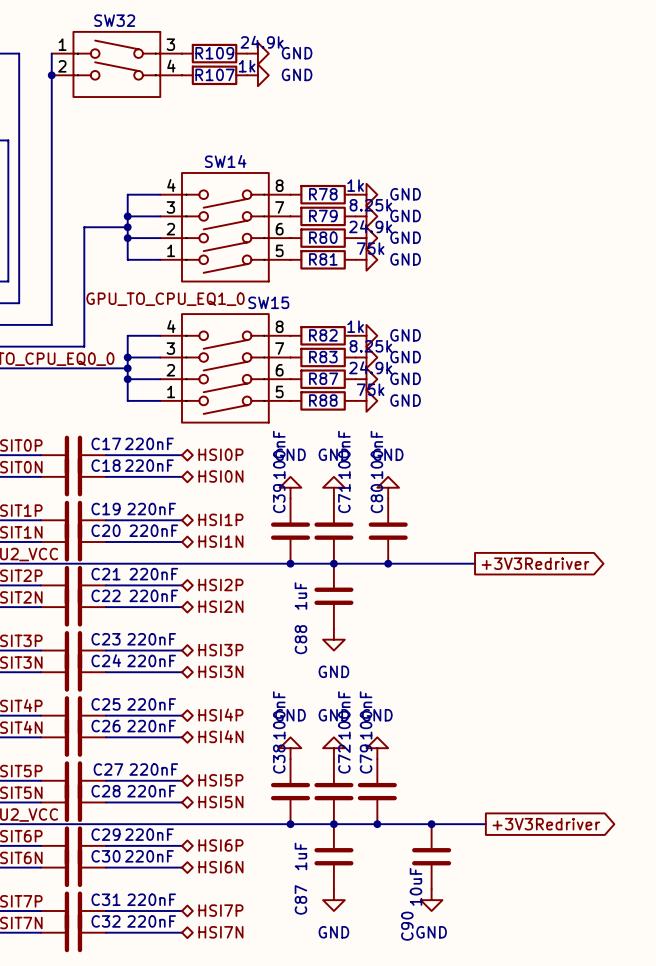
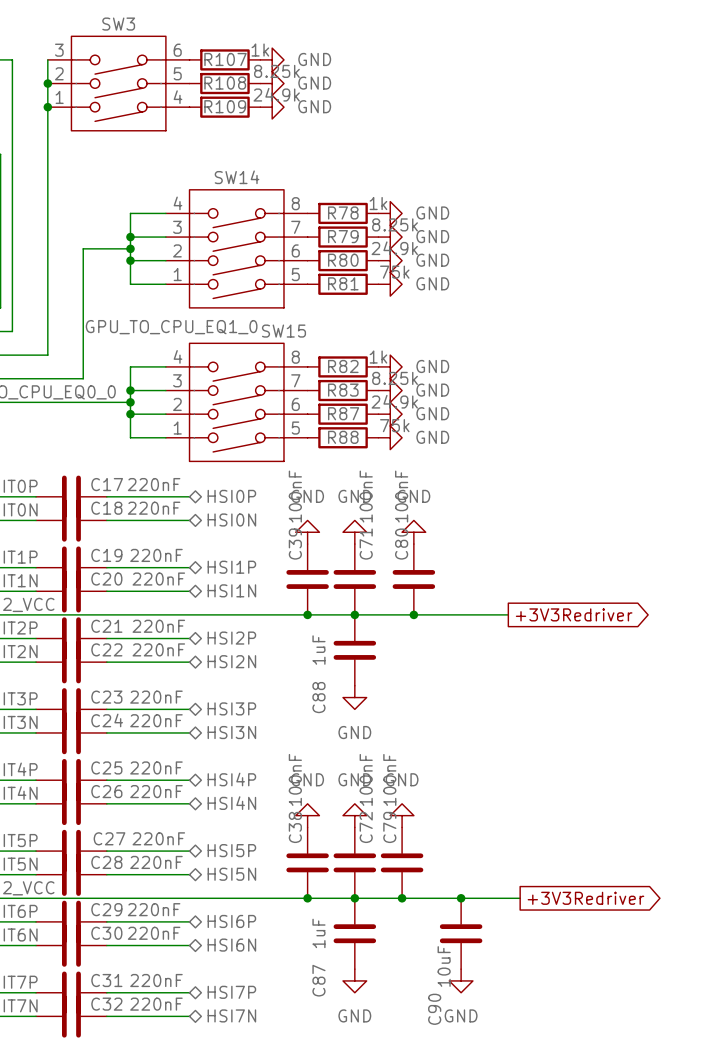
R109 value: 24.9k (262, 42) -> 1k (260, 50)
R109 name: R109 (214, 53) -> R107 (225, 59)
SW32: (116, 64) -> none
R107 value: 1k (247, 66) -> 8.25k (276, 71)
R107 name: R107 (215, 74) -> R108 (225, 83)
SW3: none -> (118, 83)
junction: none -> (47, 107)
R109: none -> 24.9k (224, 107)
power symbol: none -> GND (272, 107)

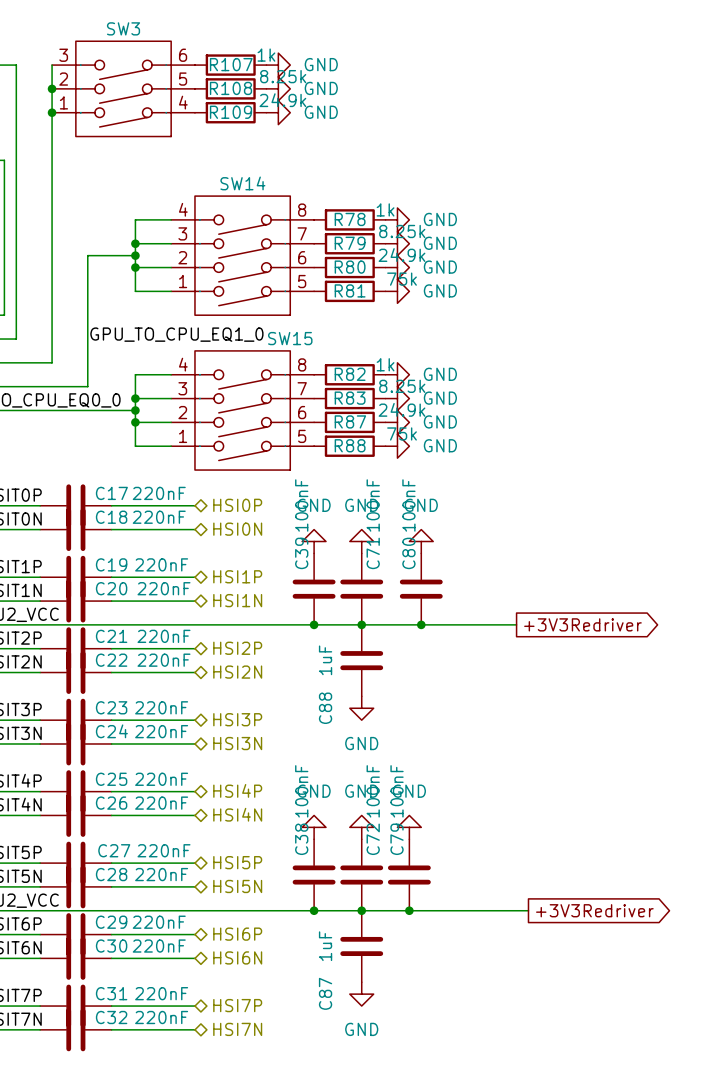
junction: (461, 898) -> none
C90: 10uF (461, 933) -> none
power symbol: GND (461, 980) -> none

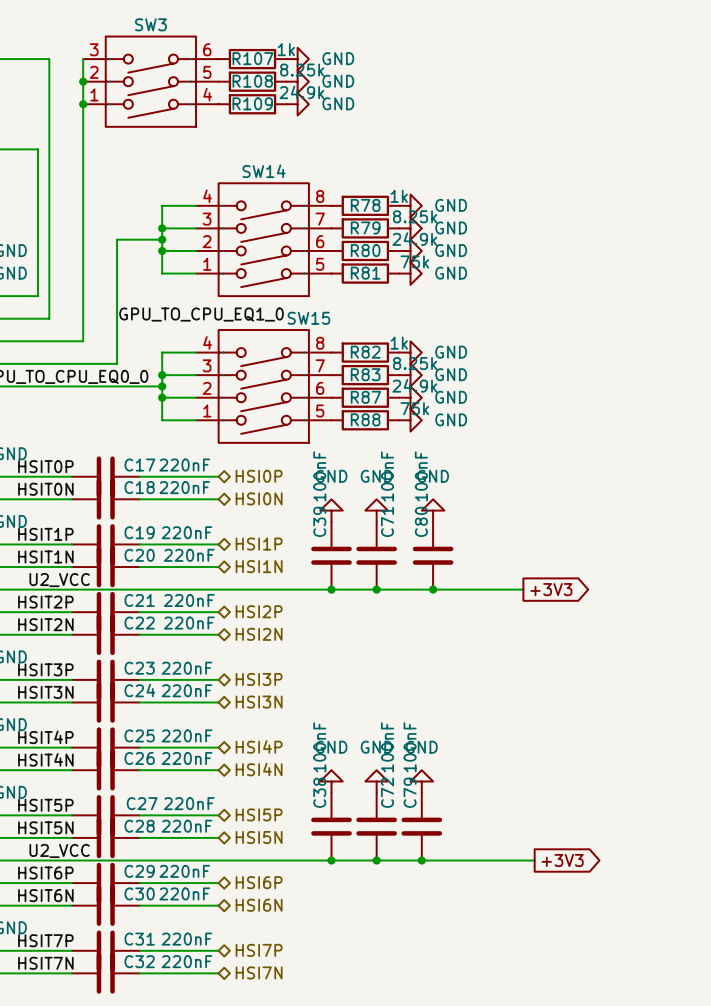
global label: +3V3Redriver (582, 624) -> +3V3 (551, 589)
C88: 1uF (361, 660) -> none
power symbol: GND (361, 708) -> none
global label: +3V3Redriver (594, 910) -> +3V3 (562, 860)
C87: 1uF (361, 946) -> none
power symbol: GND (361, 994) -> none

